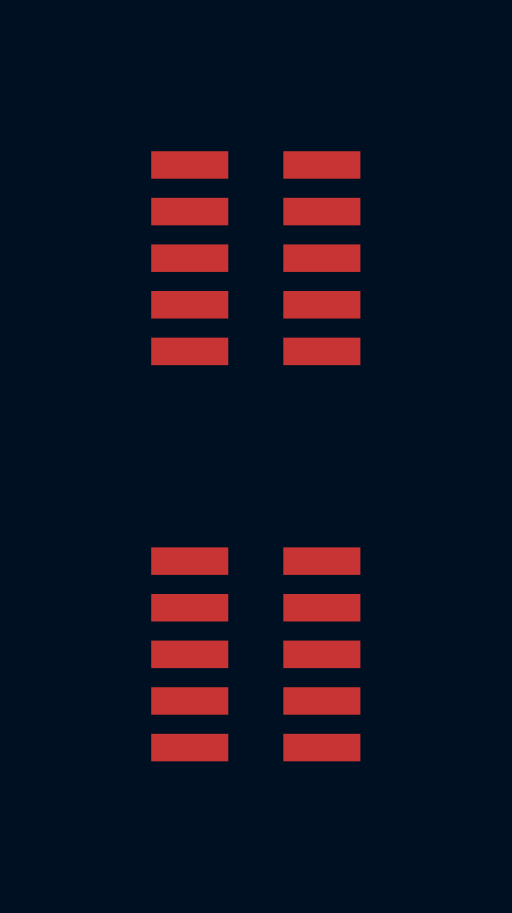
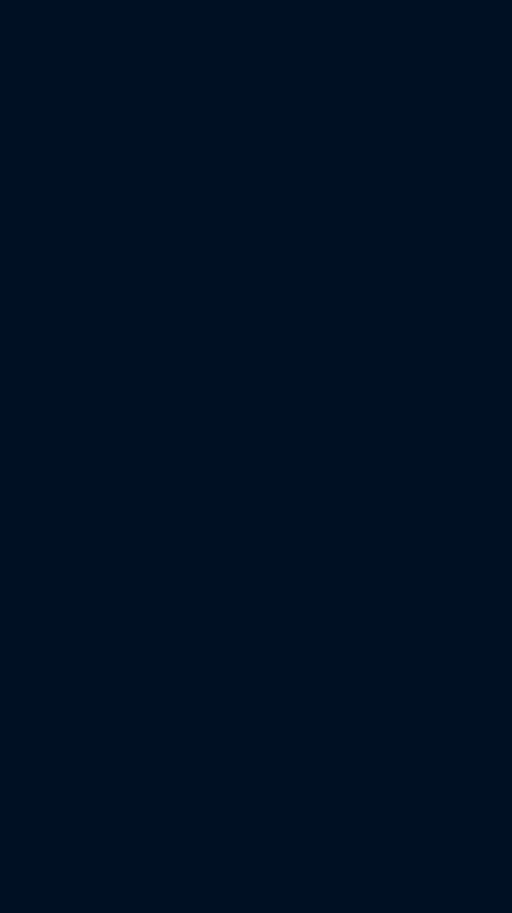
part: (255, 258) -> none
part: (255, 654) -> none

